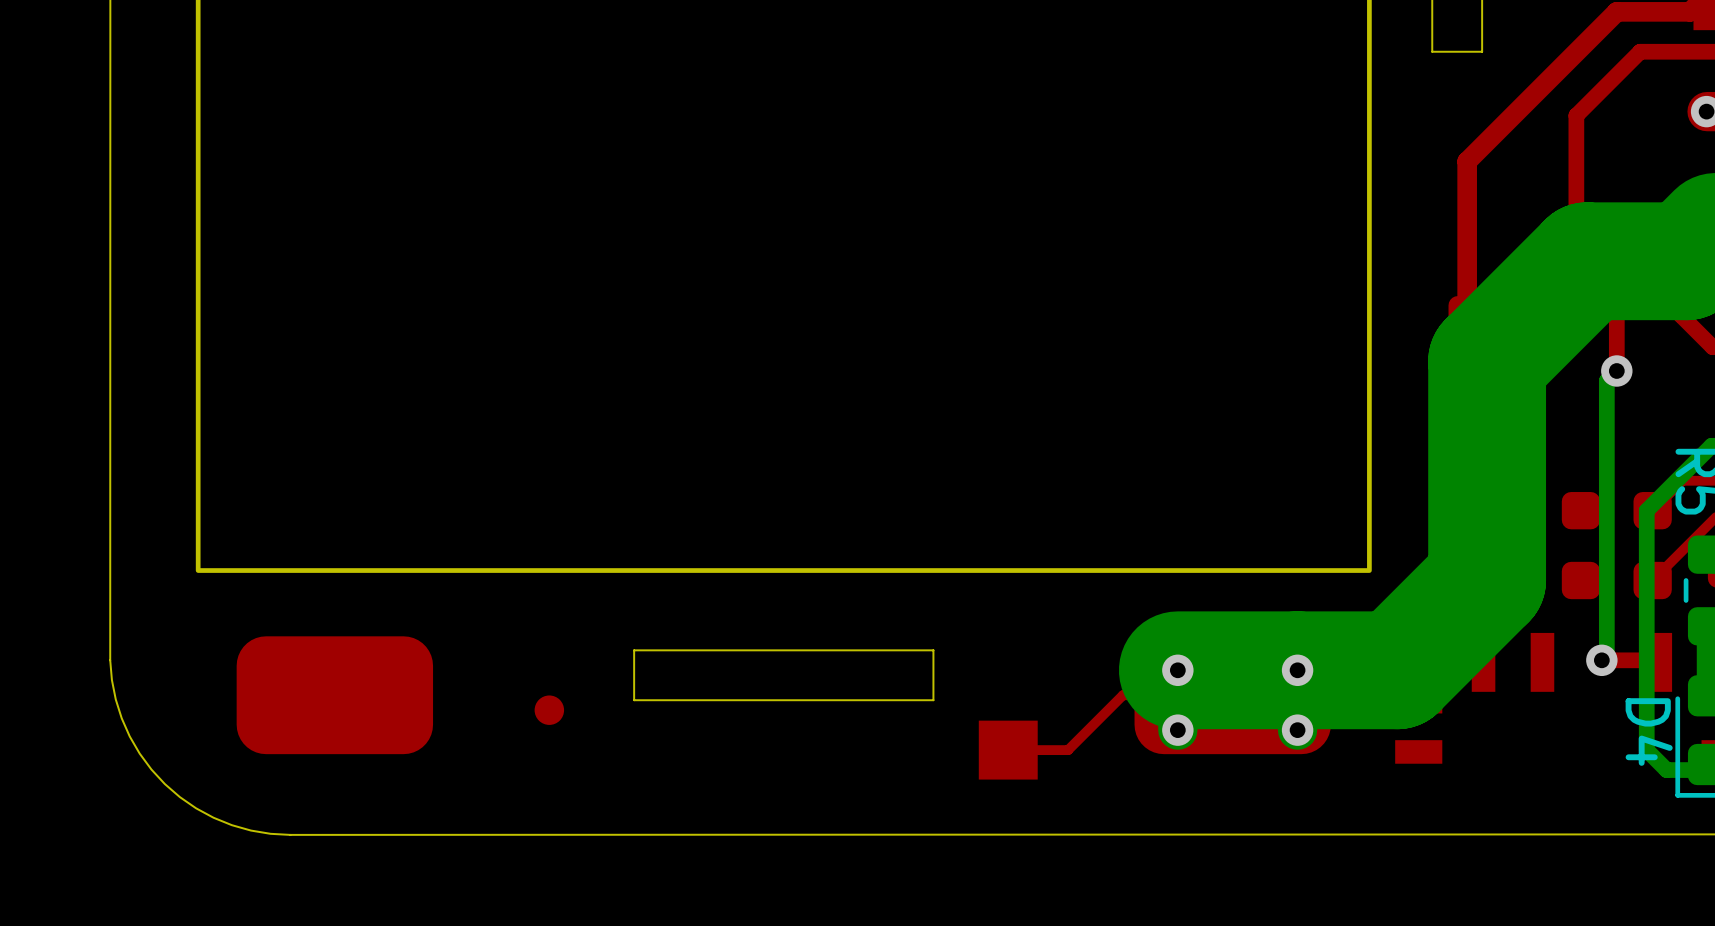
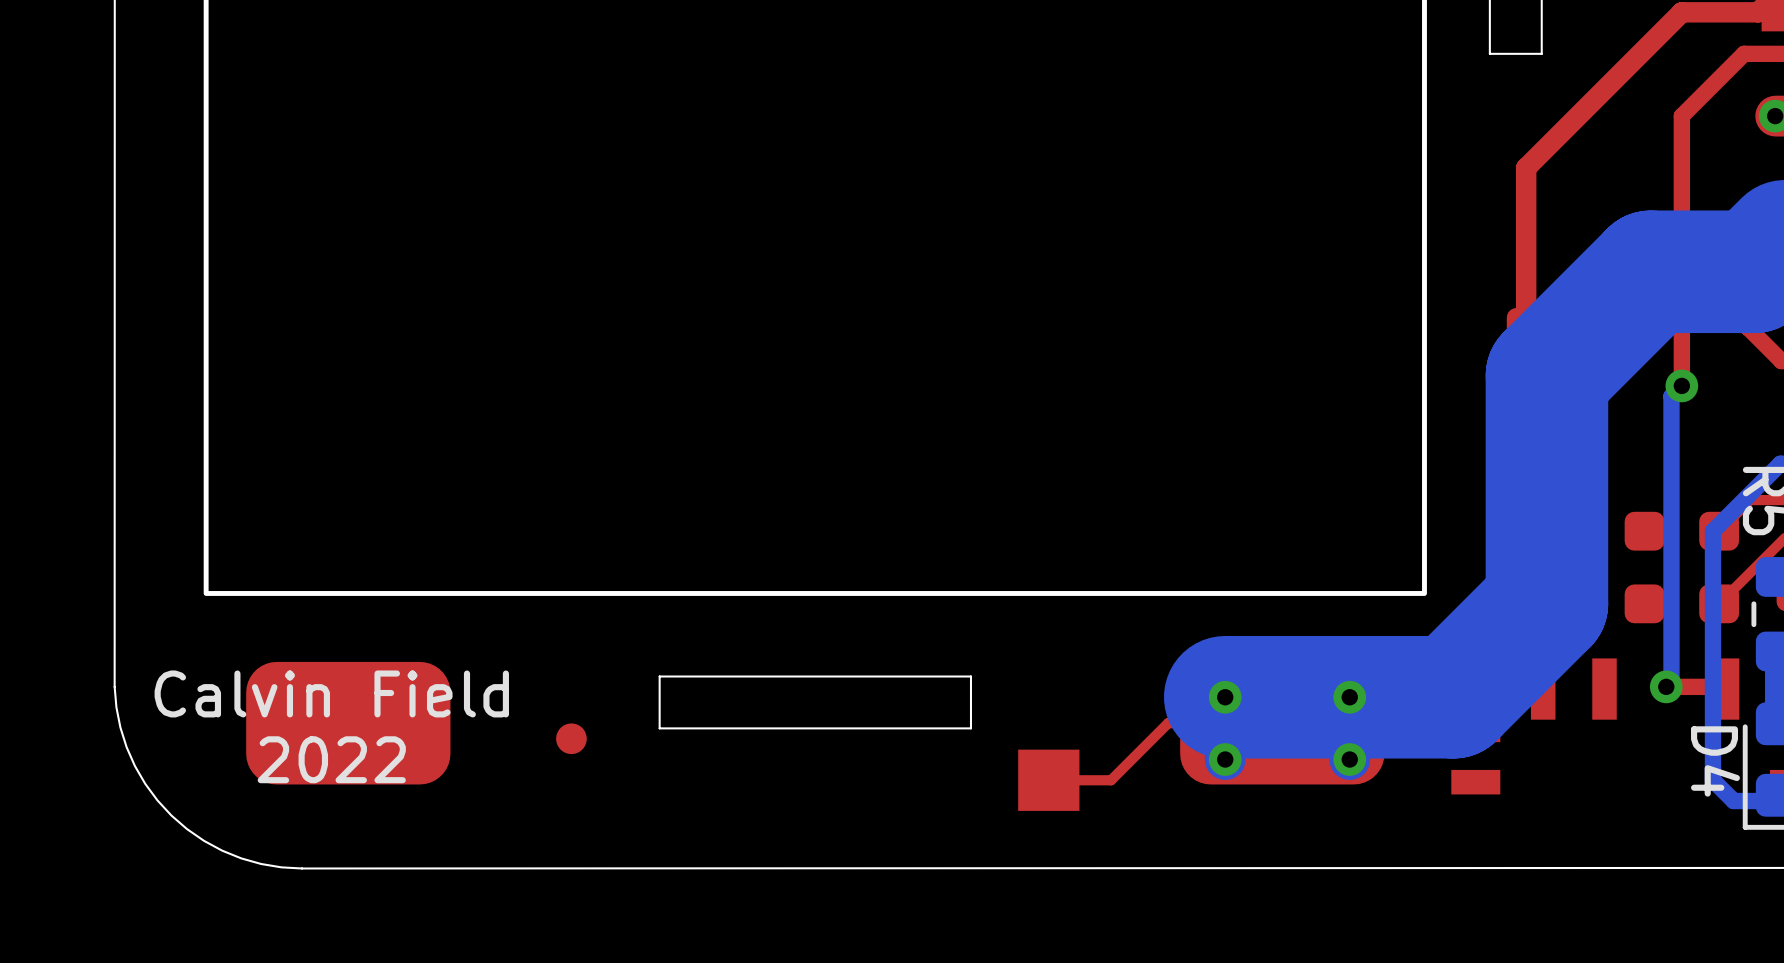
top track: (1676, 51) (1640, 51) (1576, 115) (1576, 220) (1616, 261) -> (1744, 53) (1681, 116) (1681, 271)
text: none -> Calvin Field (331, 693)
text: none -> 2022 (331, 759)

